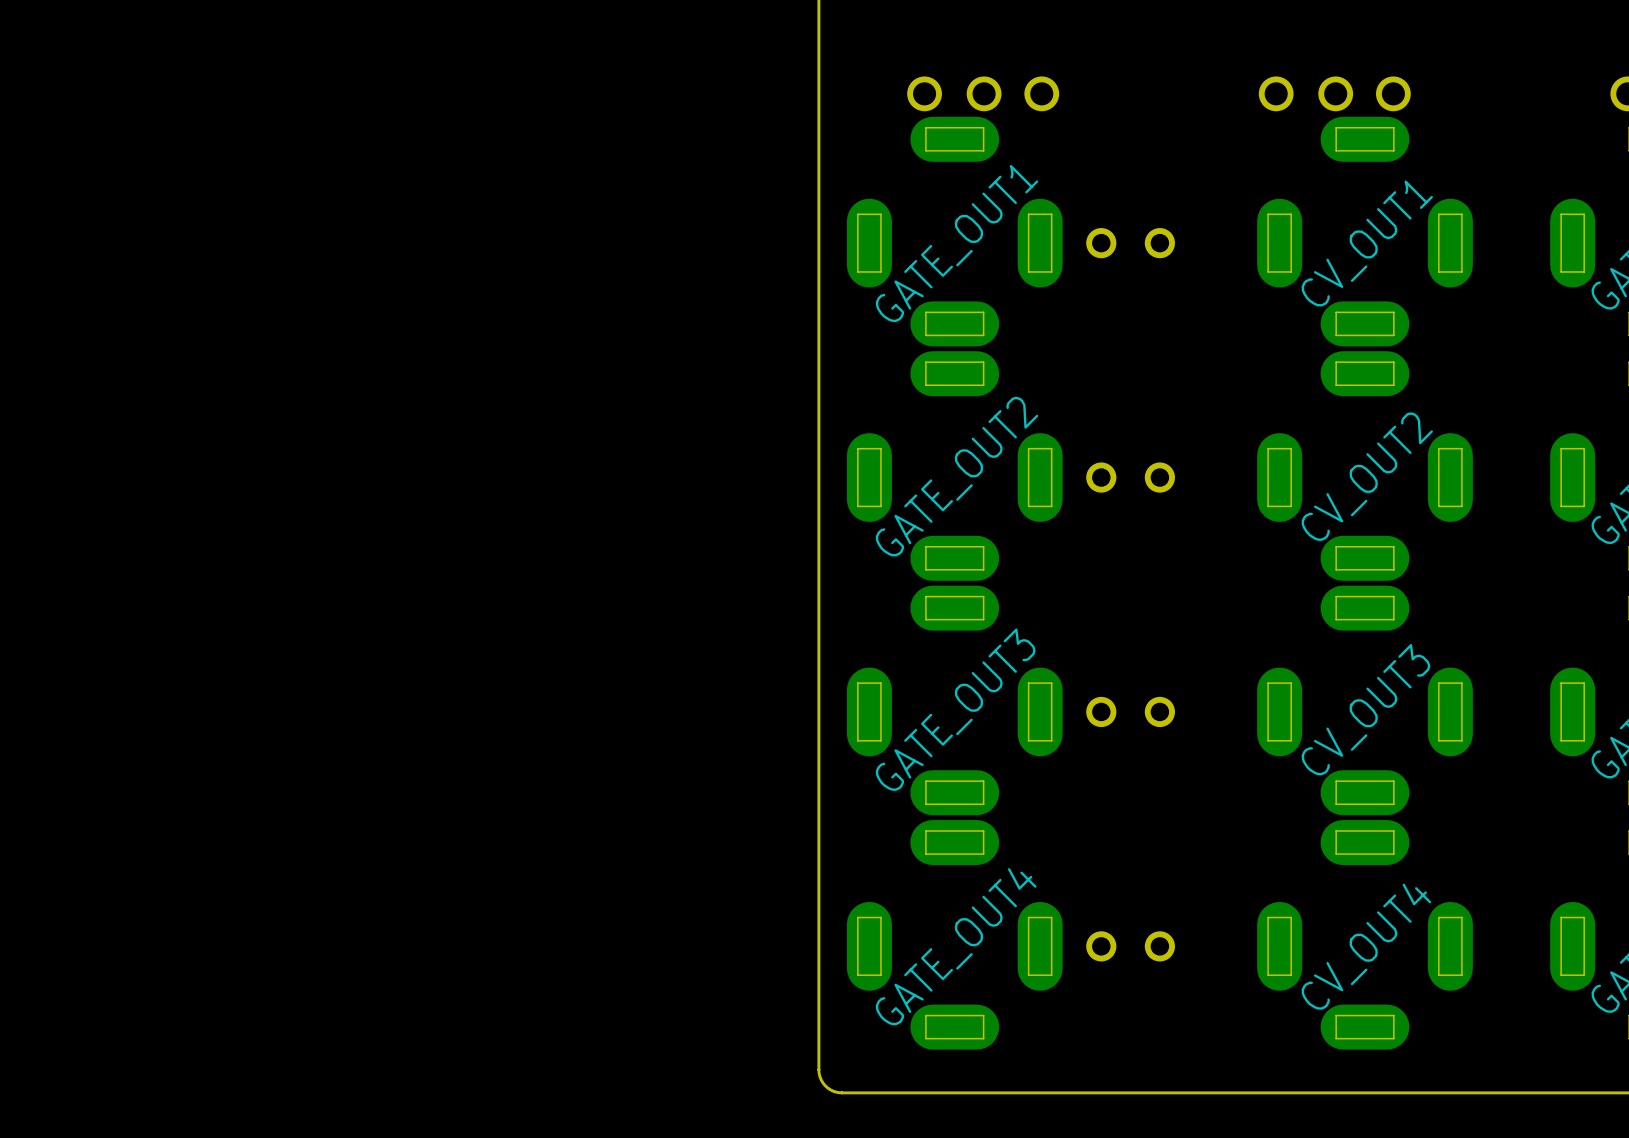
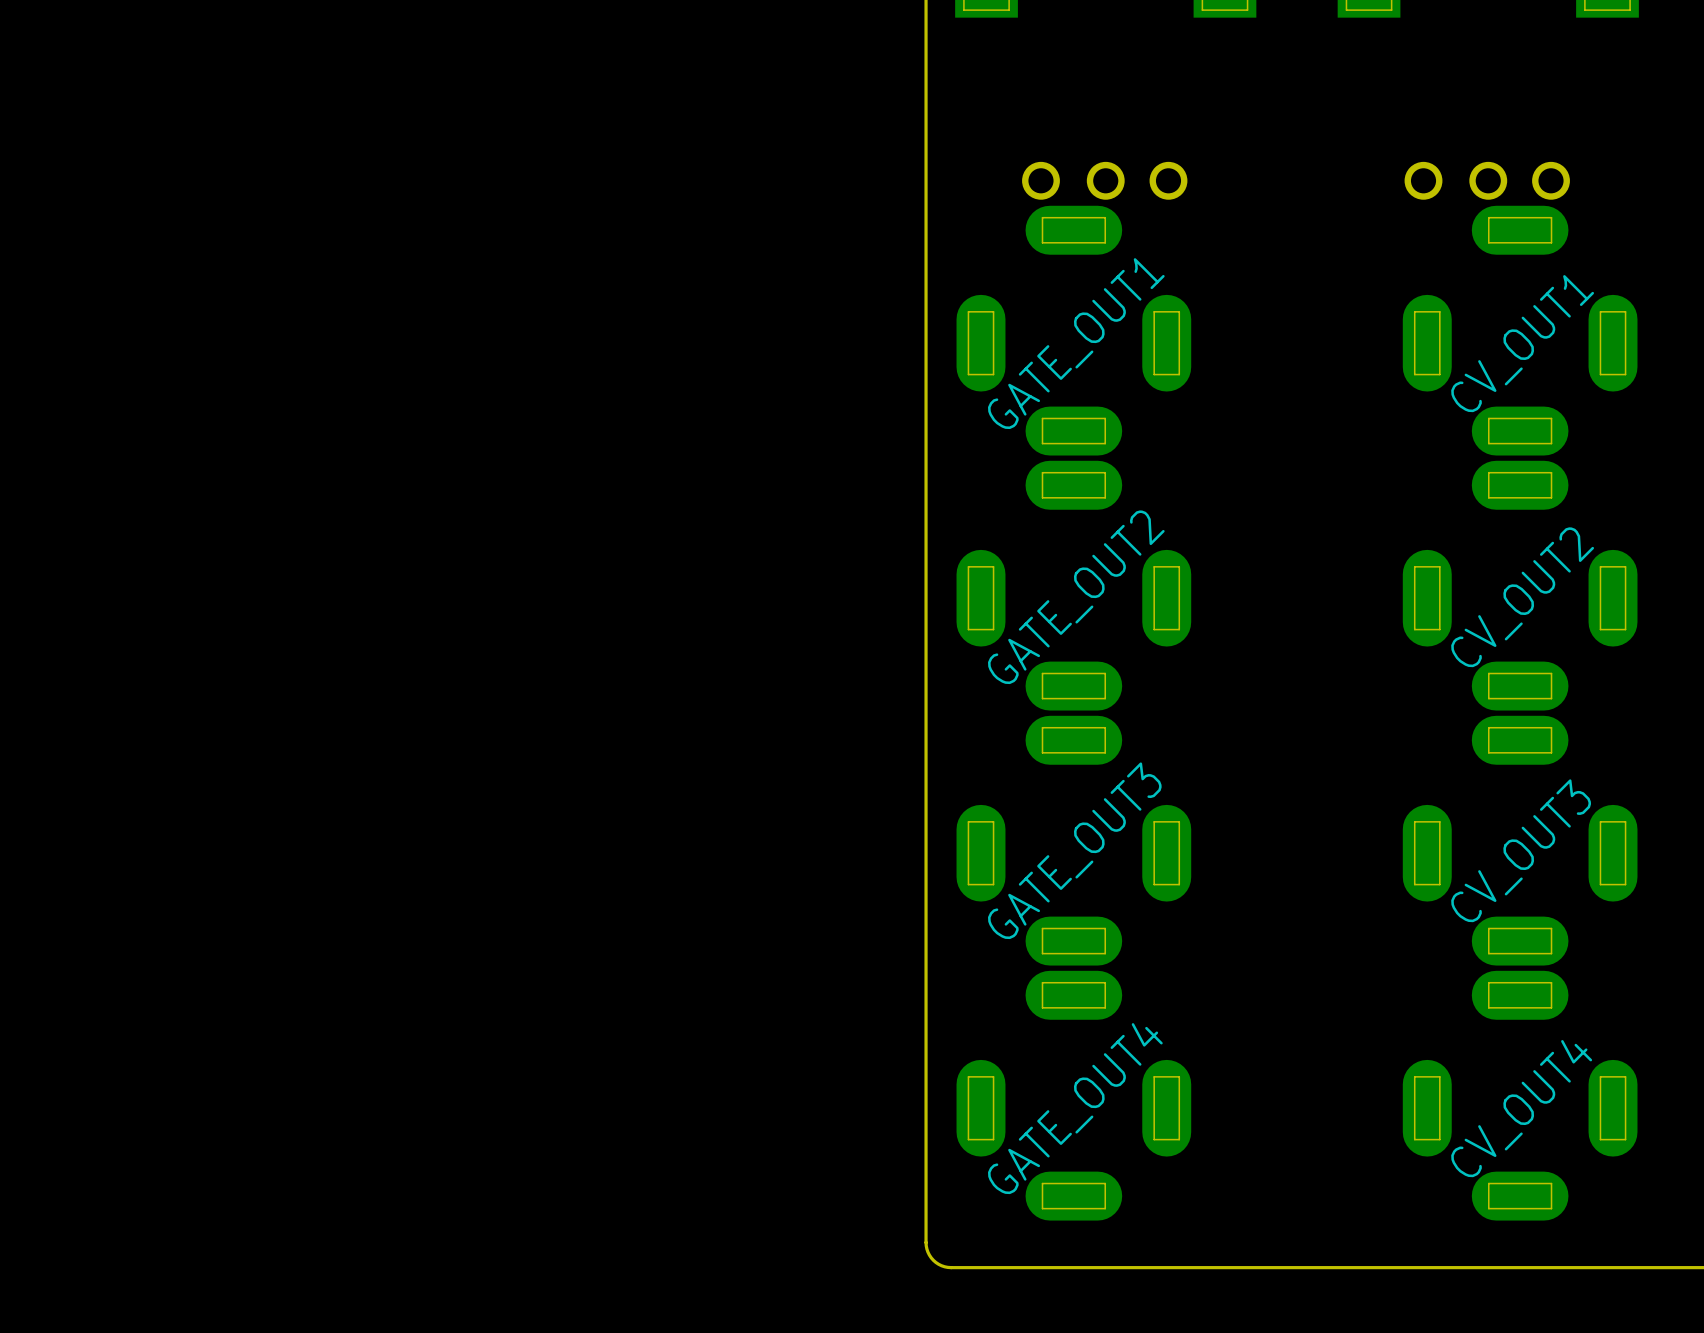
part: (1130, 243) -> none
part: (1130, 477) -> none
part: (1130, 711) -> none
part: (1130, 946) -> none

